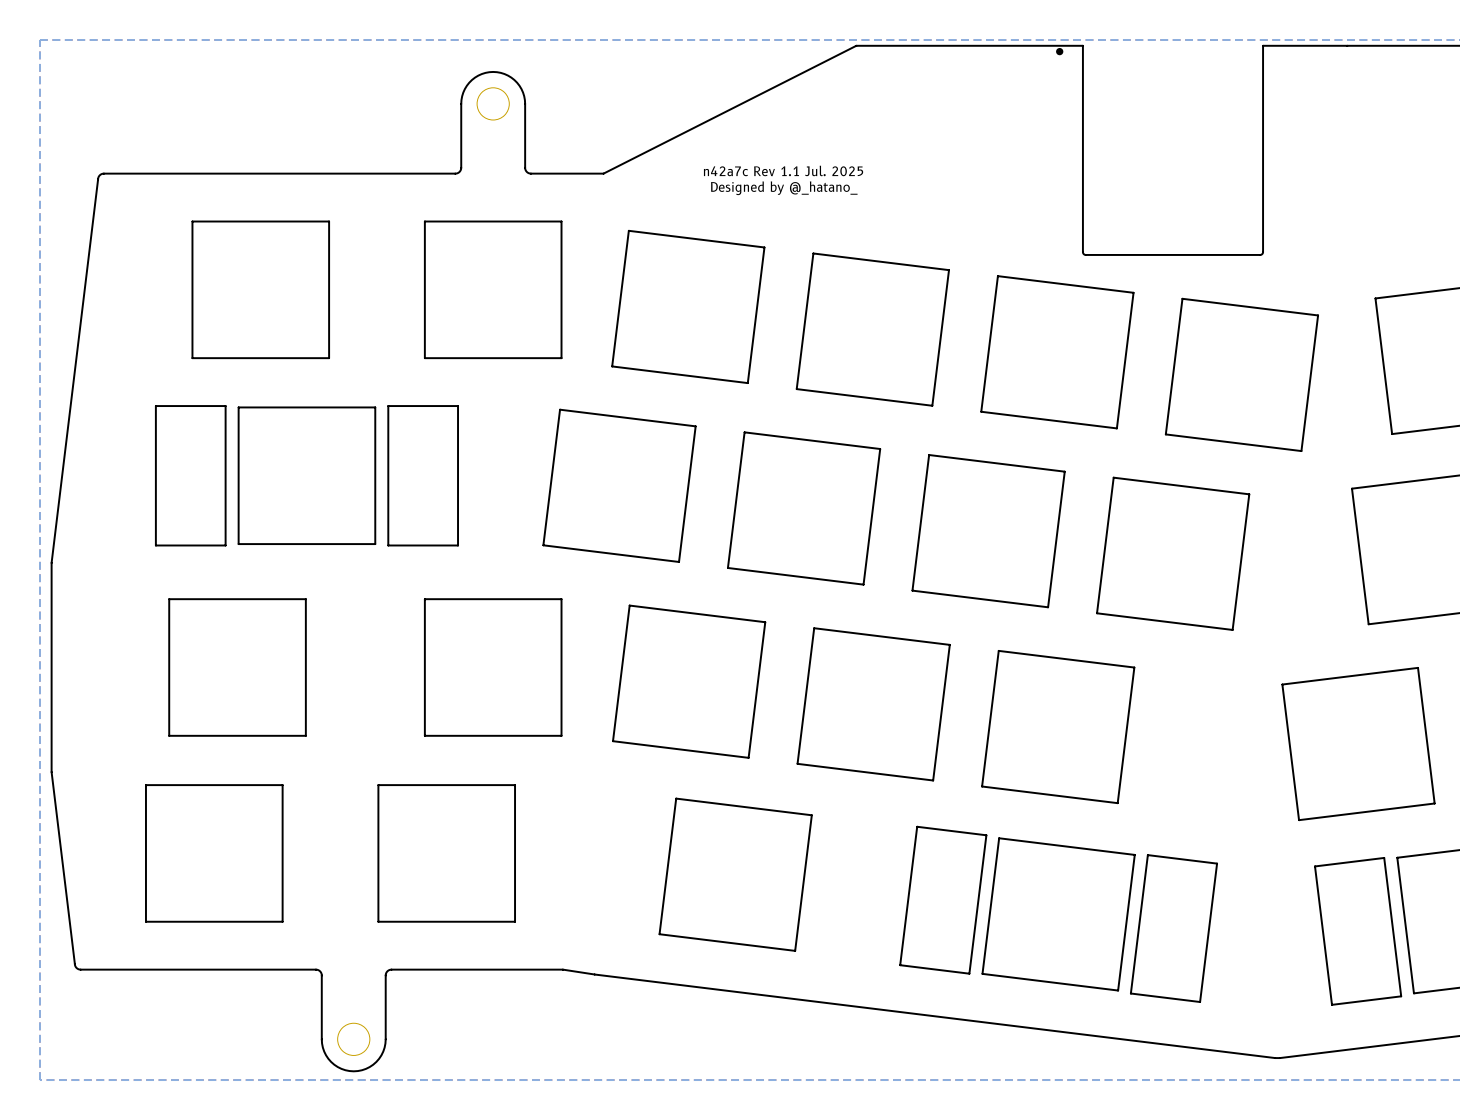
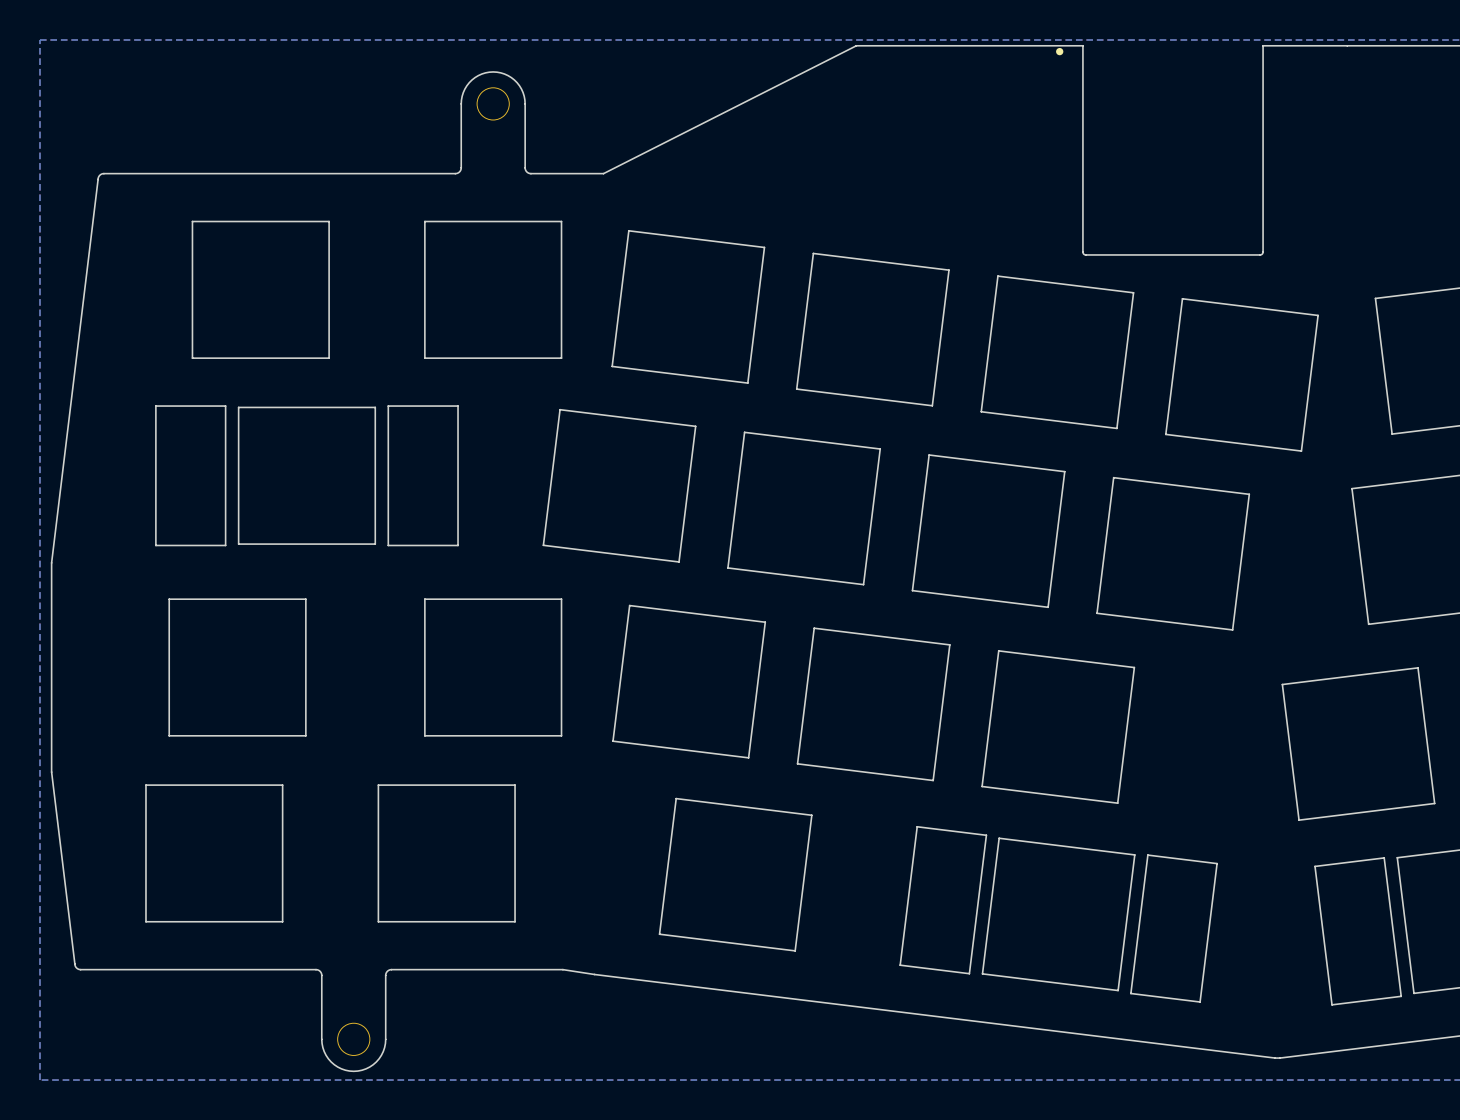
text: n42a7c Rev 1.1 Jul. 2025 (783, 170) -> none
text: Designed by @_hatano_ (784, 188) -> none

